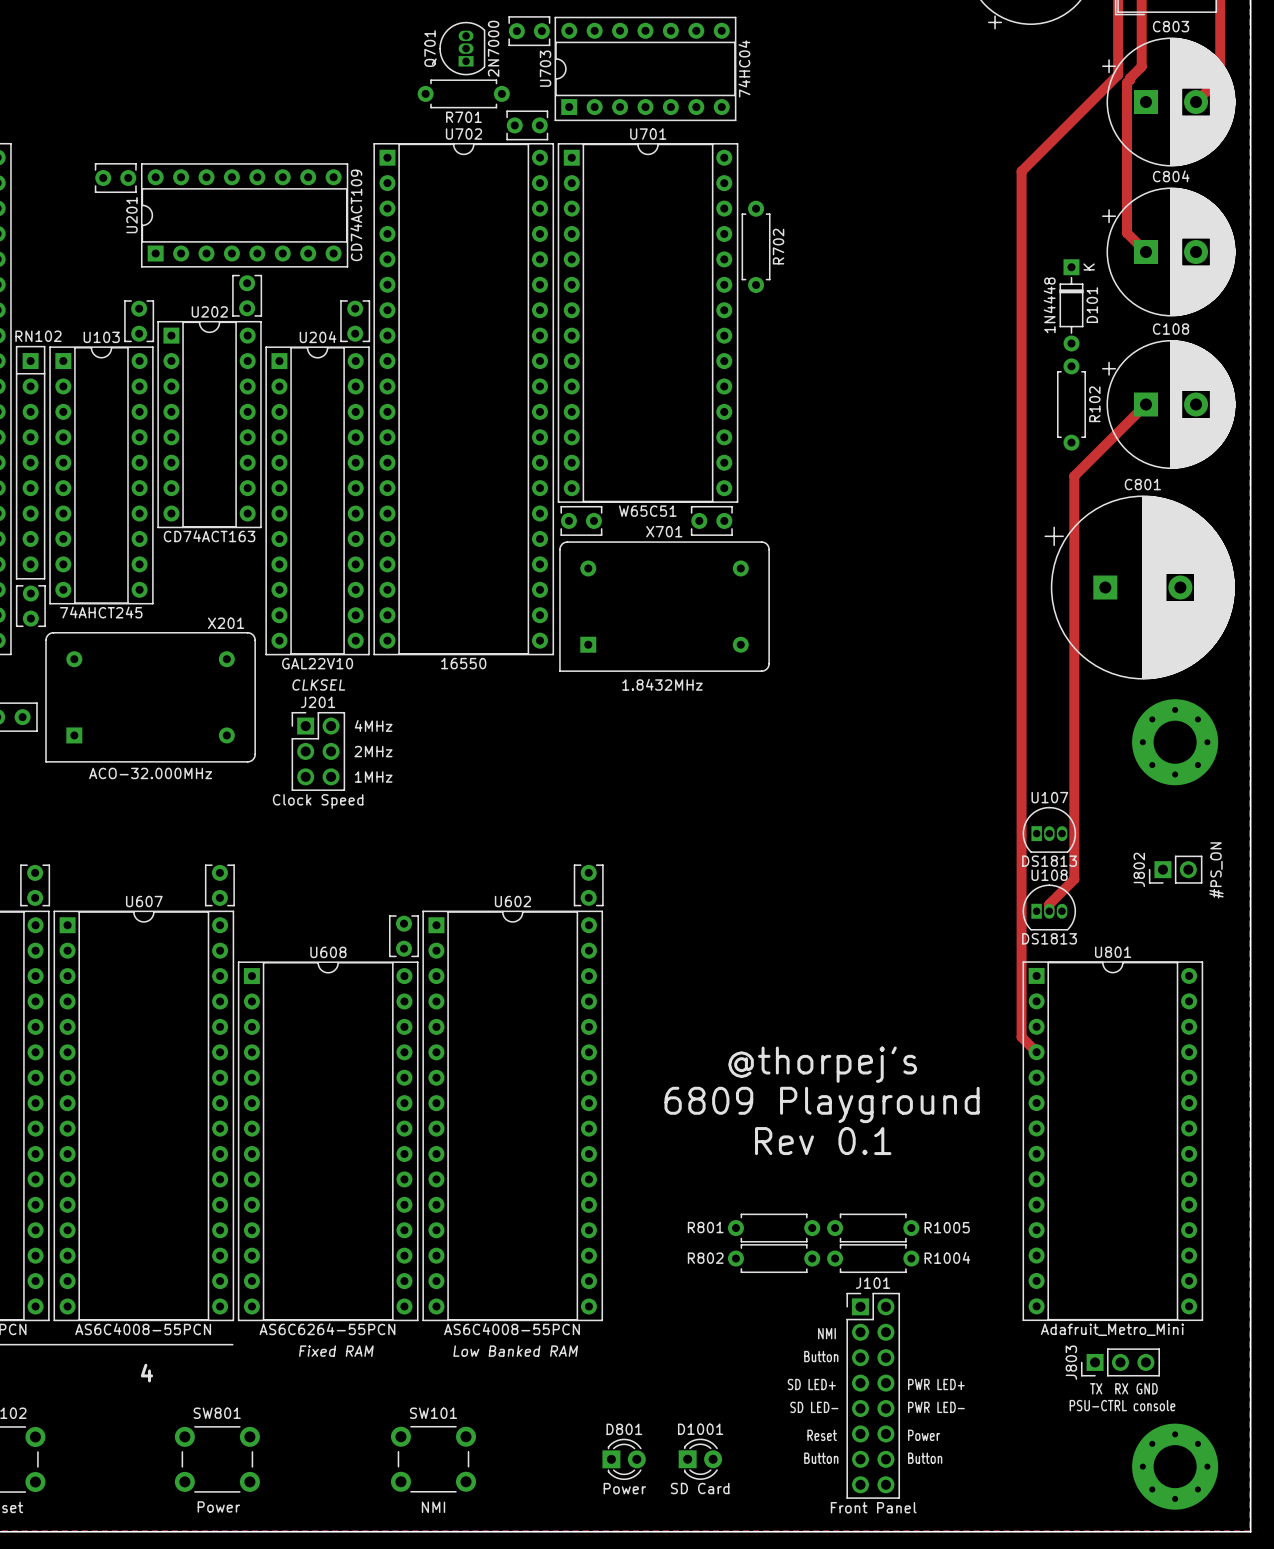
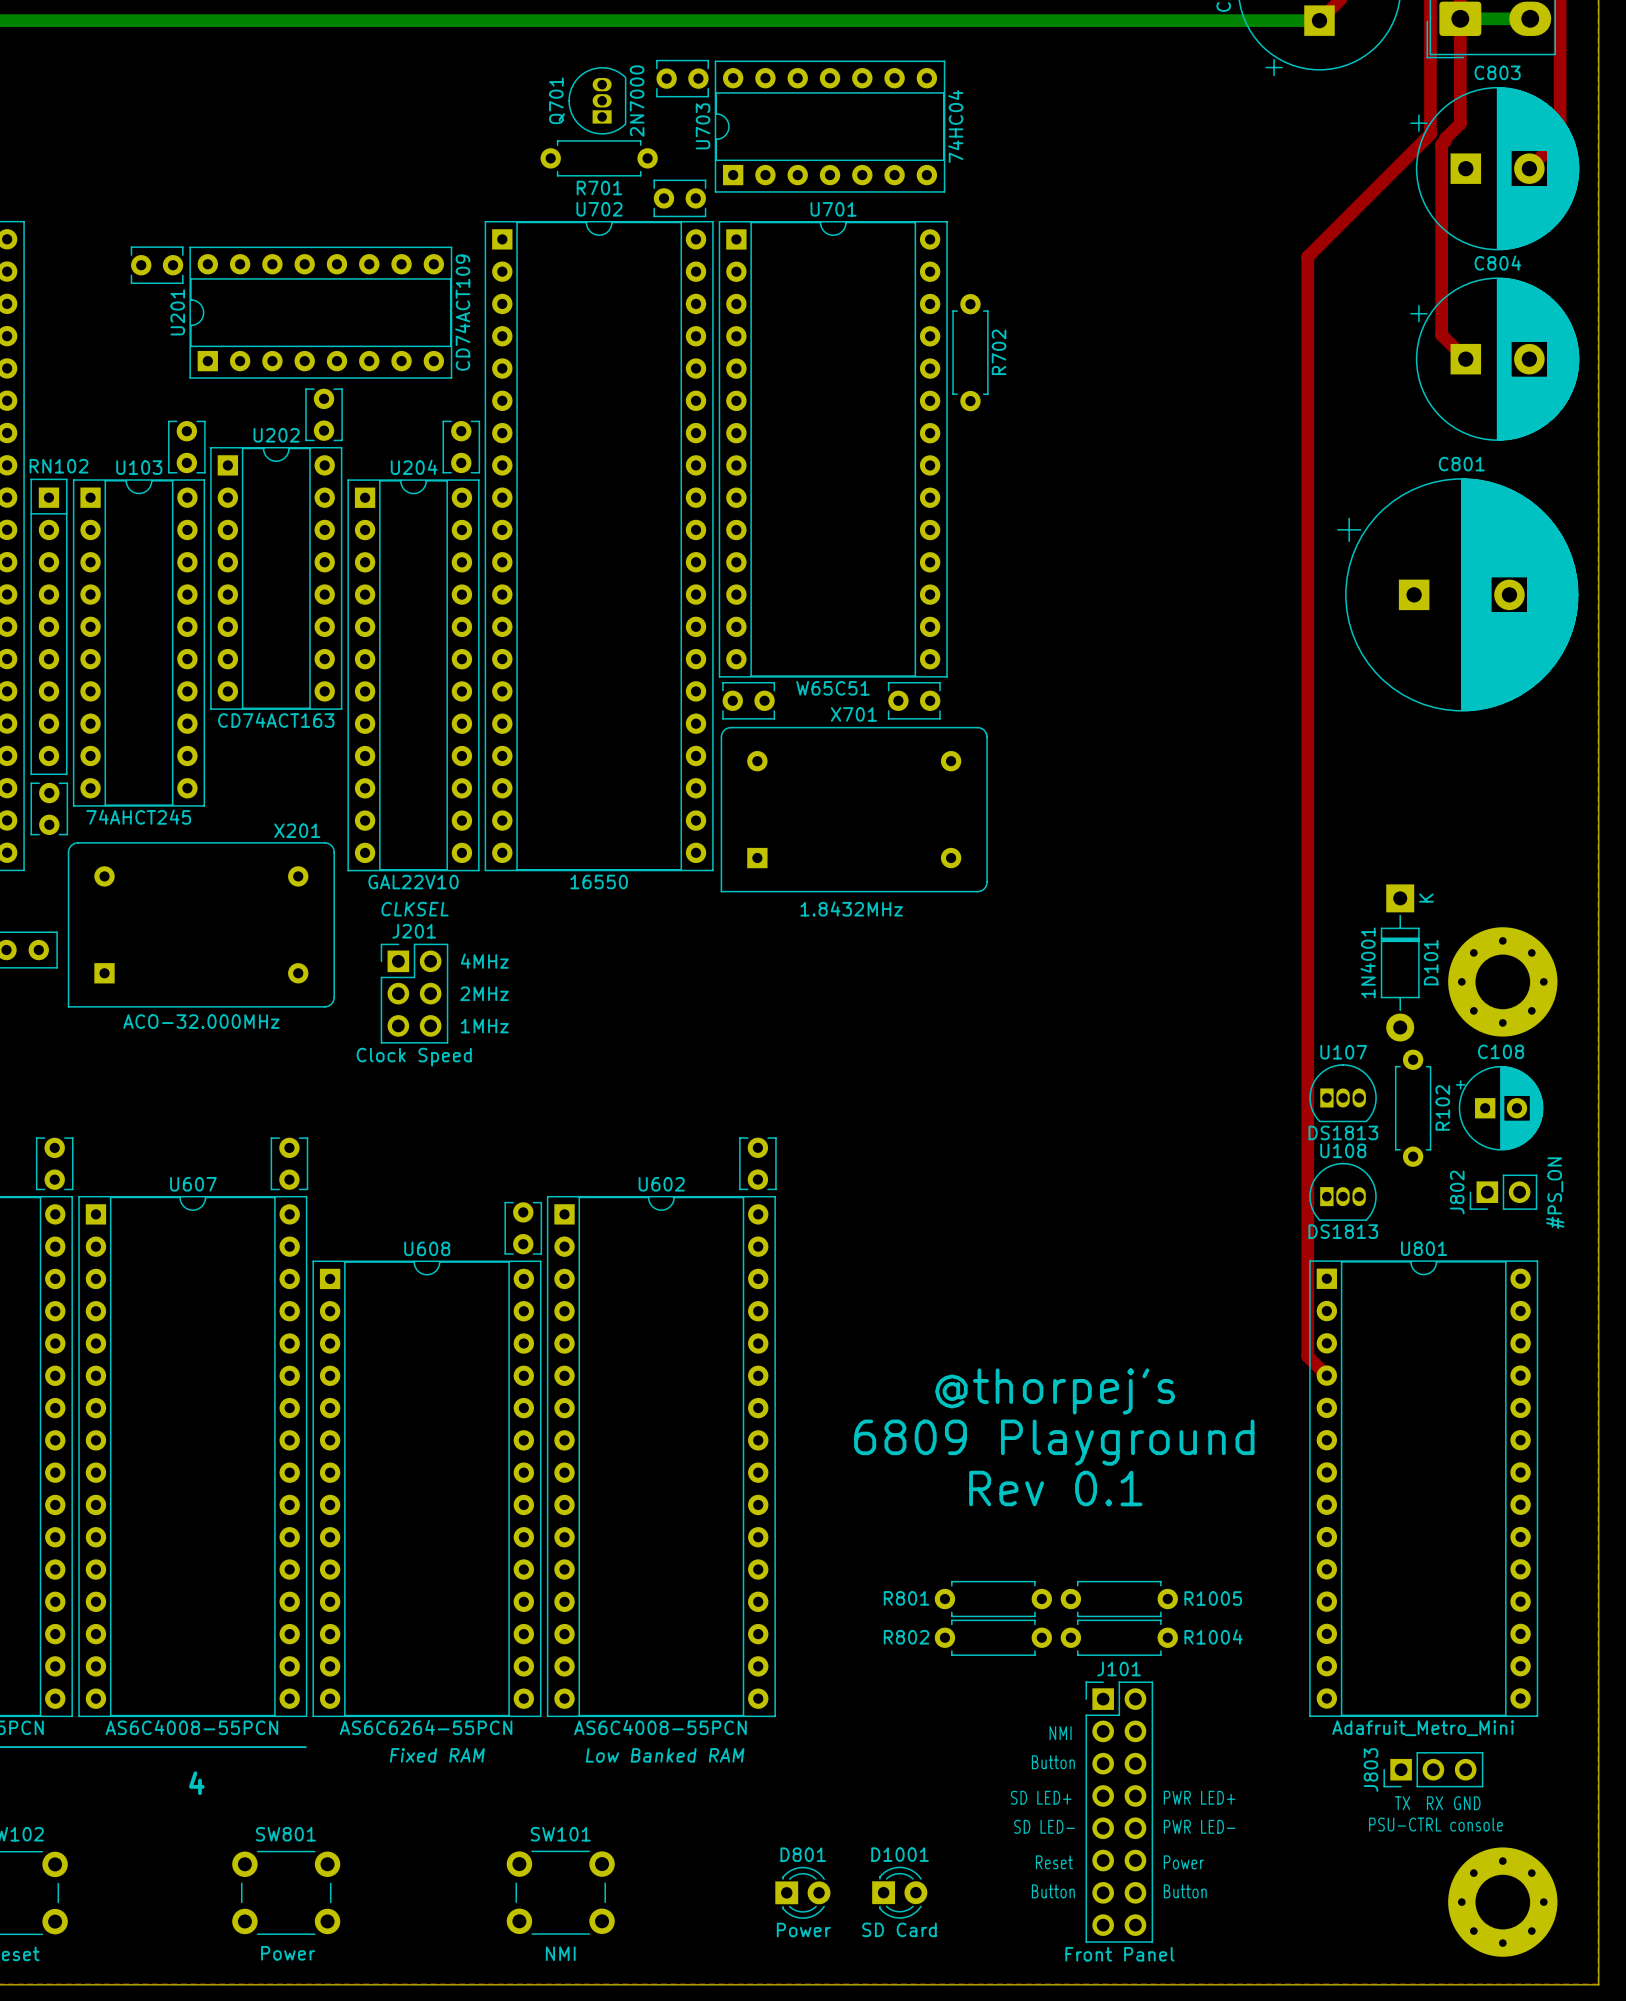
D101 footprint: [1059, 259, 1084, 352] -> [1380, 884, 1420, 1042]
D101 value: 1N4448 (1049, 305) -> 1N4001 (1368, 962)
C108 name position: C108 (1171, 329) -> C108 (1501, 1051)
C108 footprint: [1102, 340, 1236, 469] -> [1455, 1065, 1544, 1151]
R102 position: (1071, 404) -> (1413, 1108)
top track: (1146, 404) (1074, 476) (1074, 879) (1049, 904) (1049, 911) -> none
C801 position: (1139, 587) -> (1457, 594)
J802 position: (1175, 869) -> (1503, 1192)

